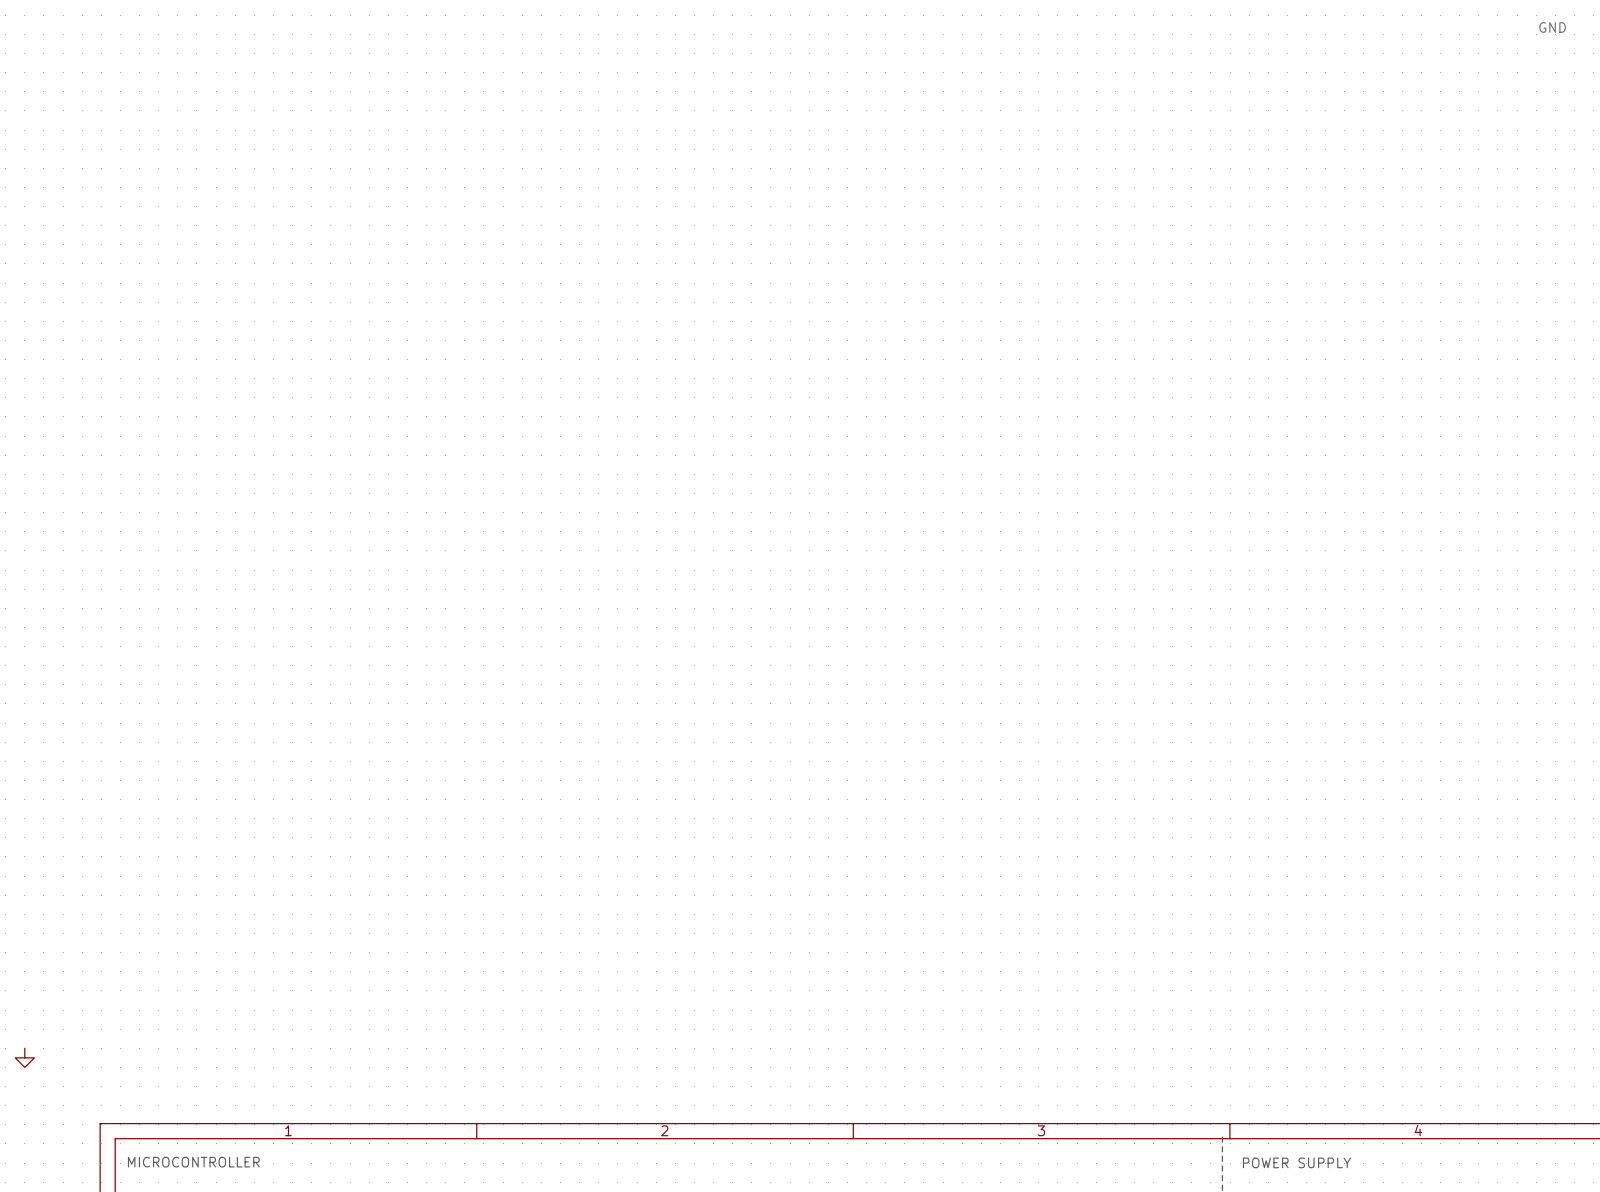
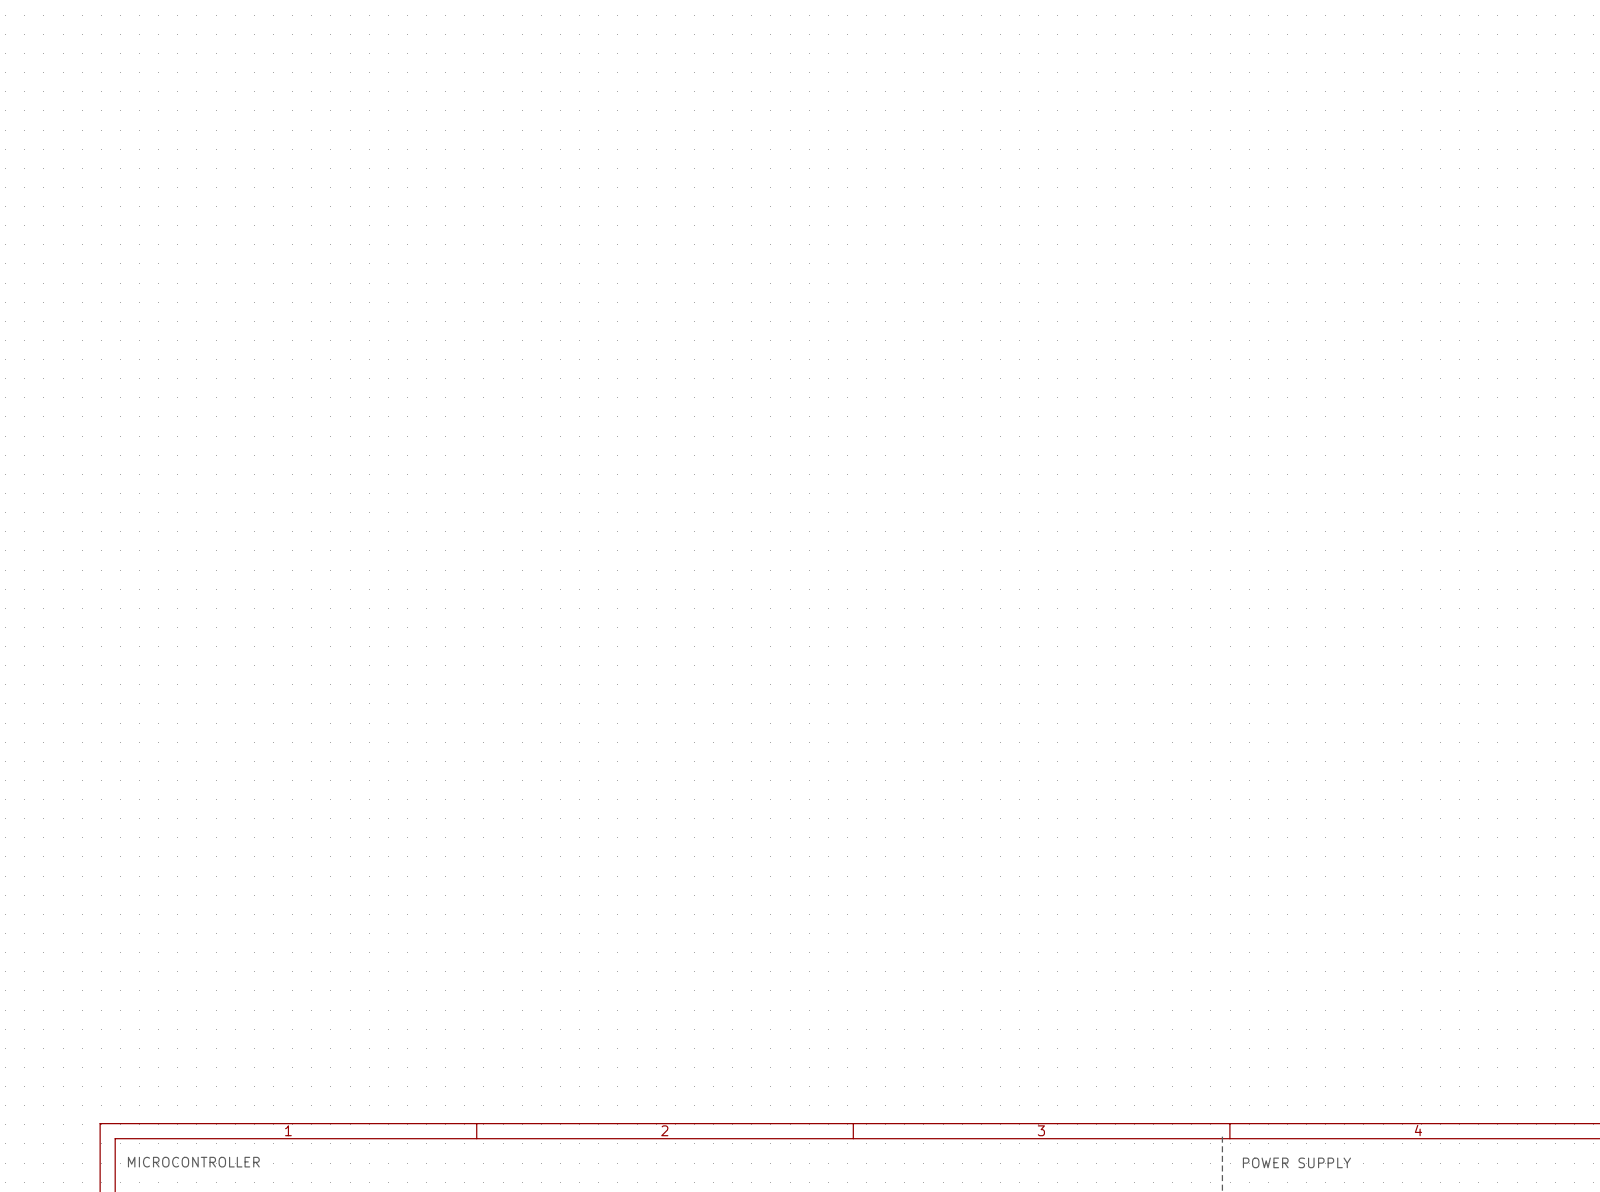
power symbol: GND (24, 1057) -> none

